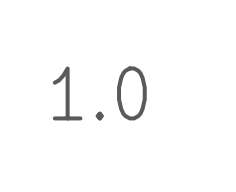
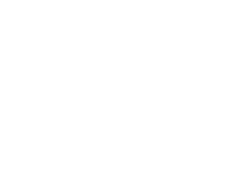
text: 1.0 (99, 93) -> none

